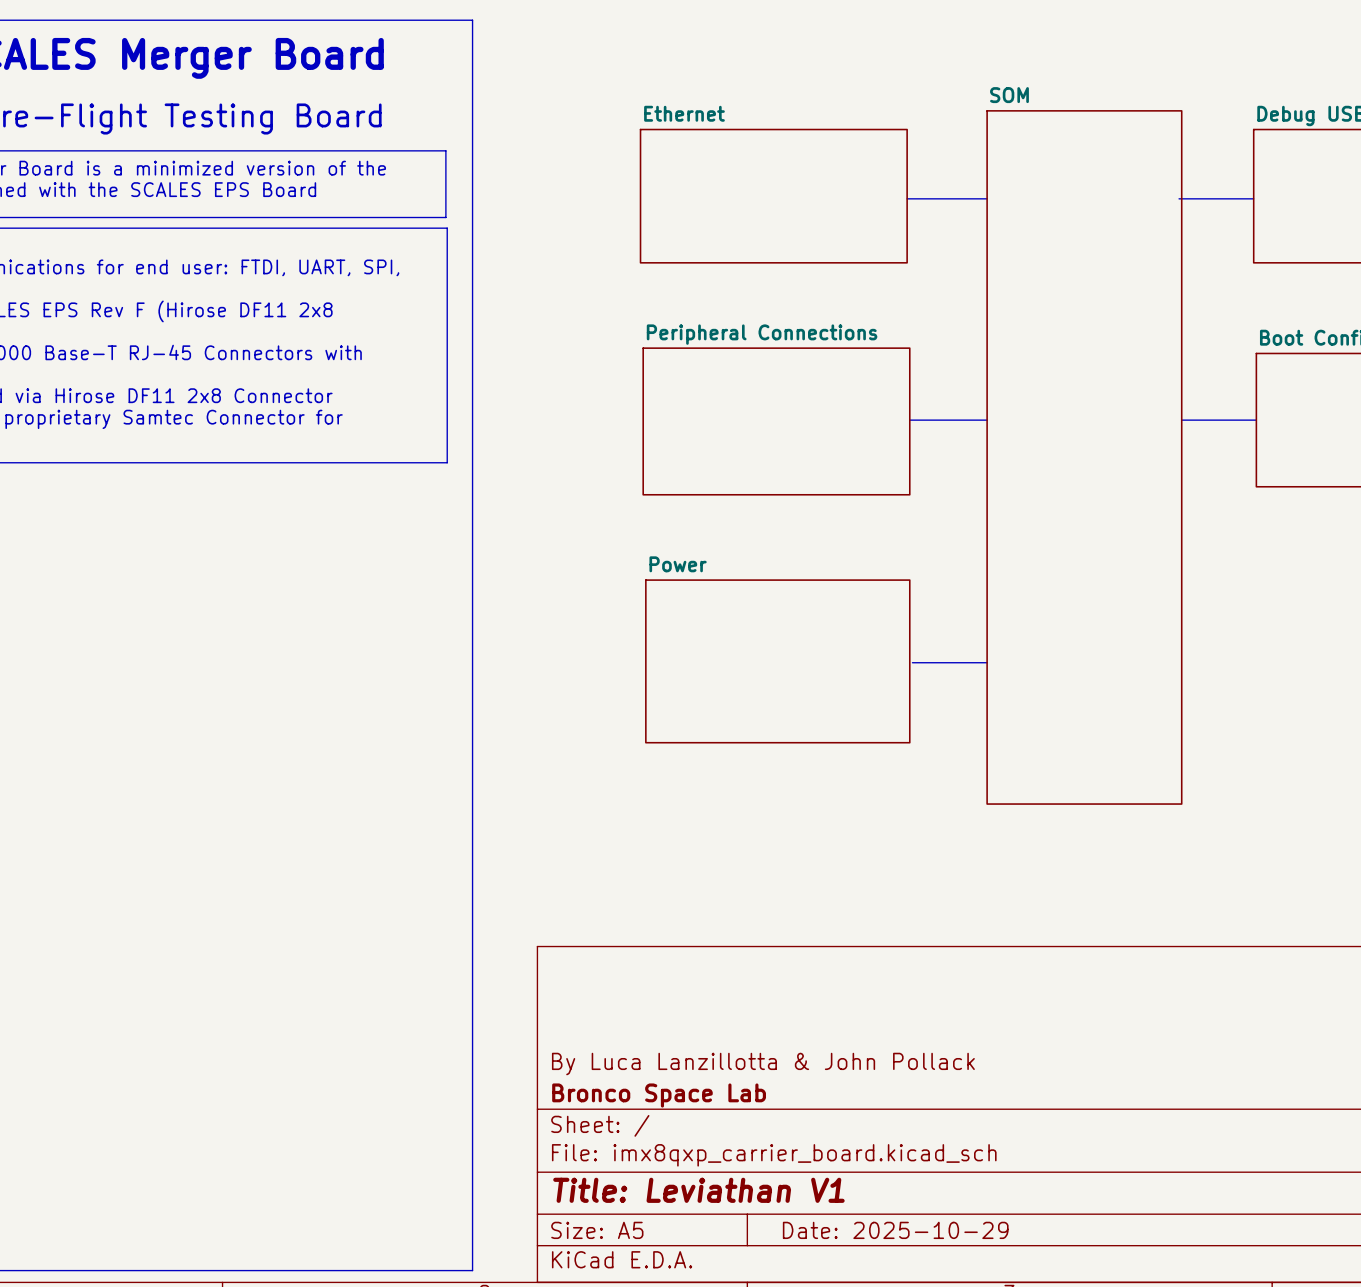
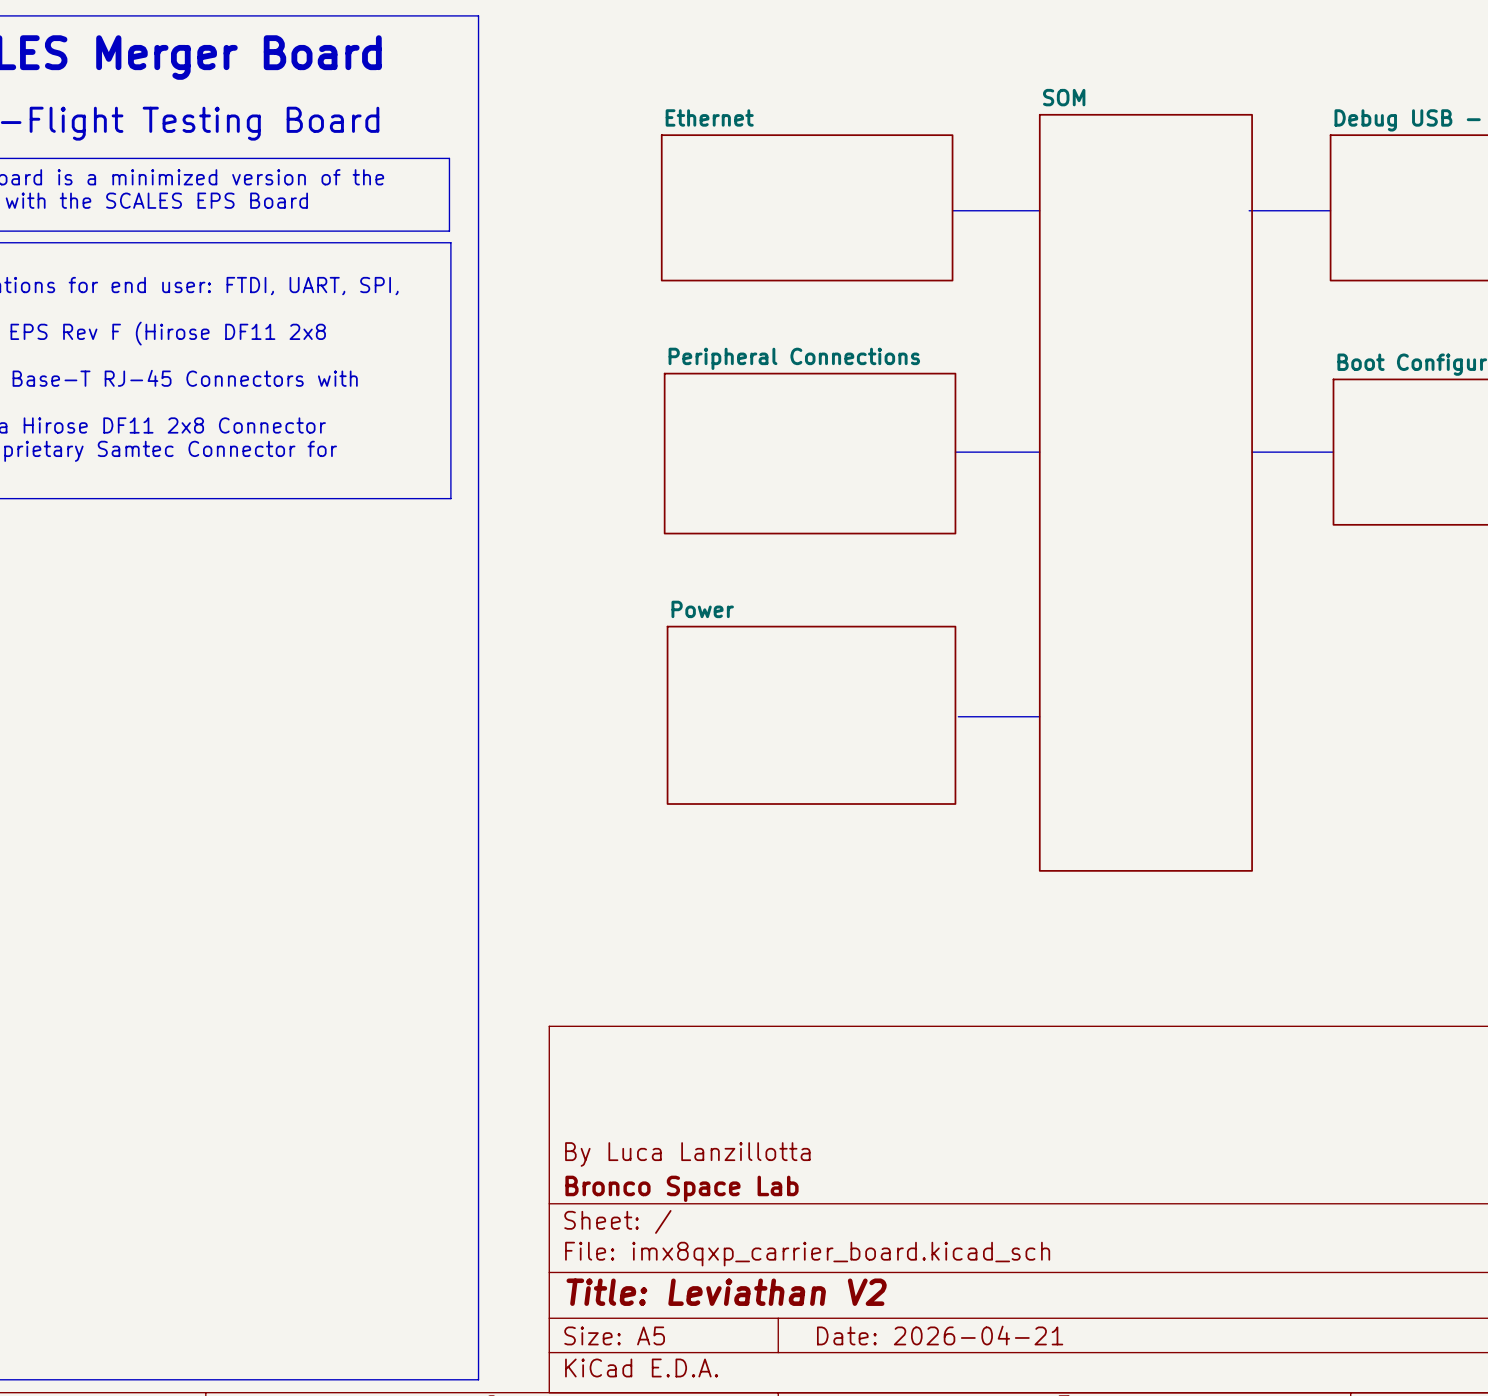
title block: By Luca Lanzillotta & John Pollack (763, 1064) -> By Luca Lanzillotta (687, 1154)
title block: Title: Leviathan V1 (698, 1190) -> Title: Leviathan V2 (726, 1292)
title block: Date: 2025-10-29 (895, 1230) -> Date: 2026-04-21 (940, 1335)

